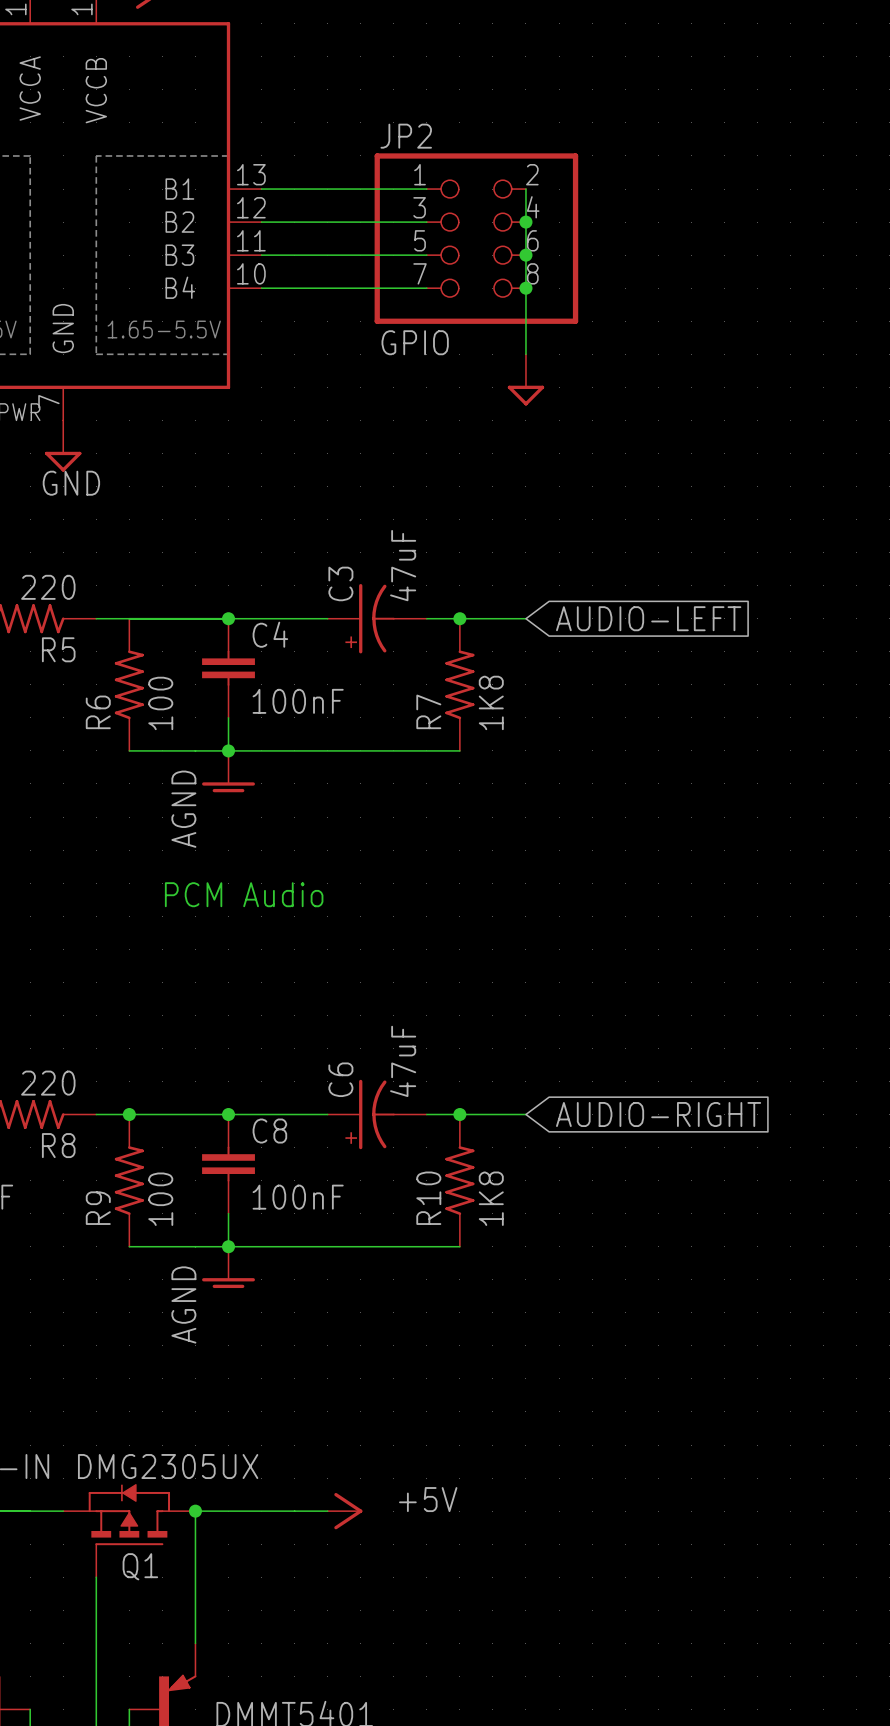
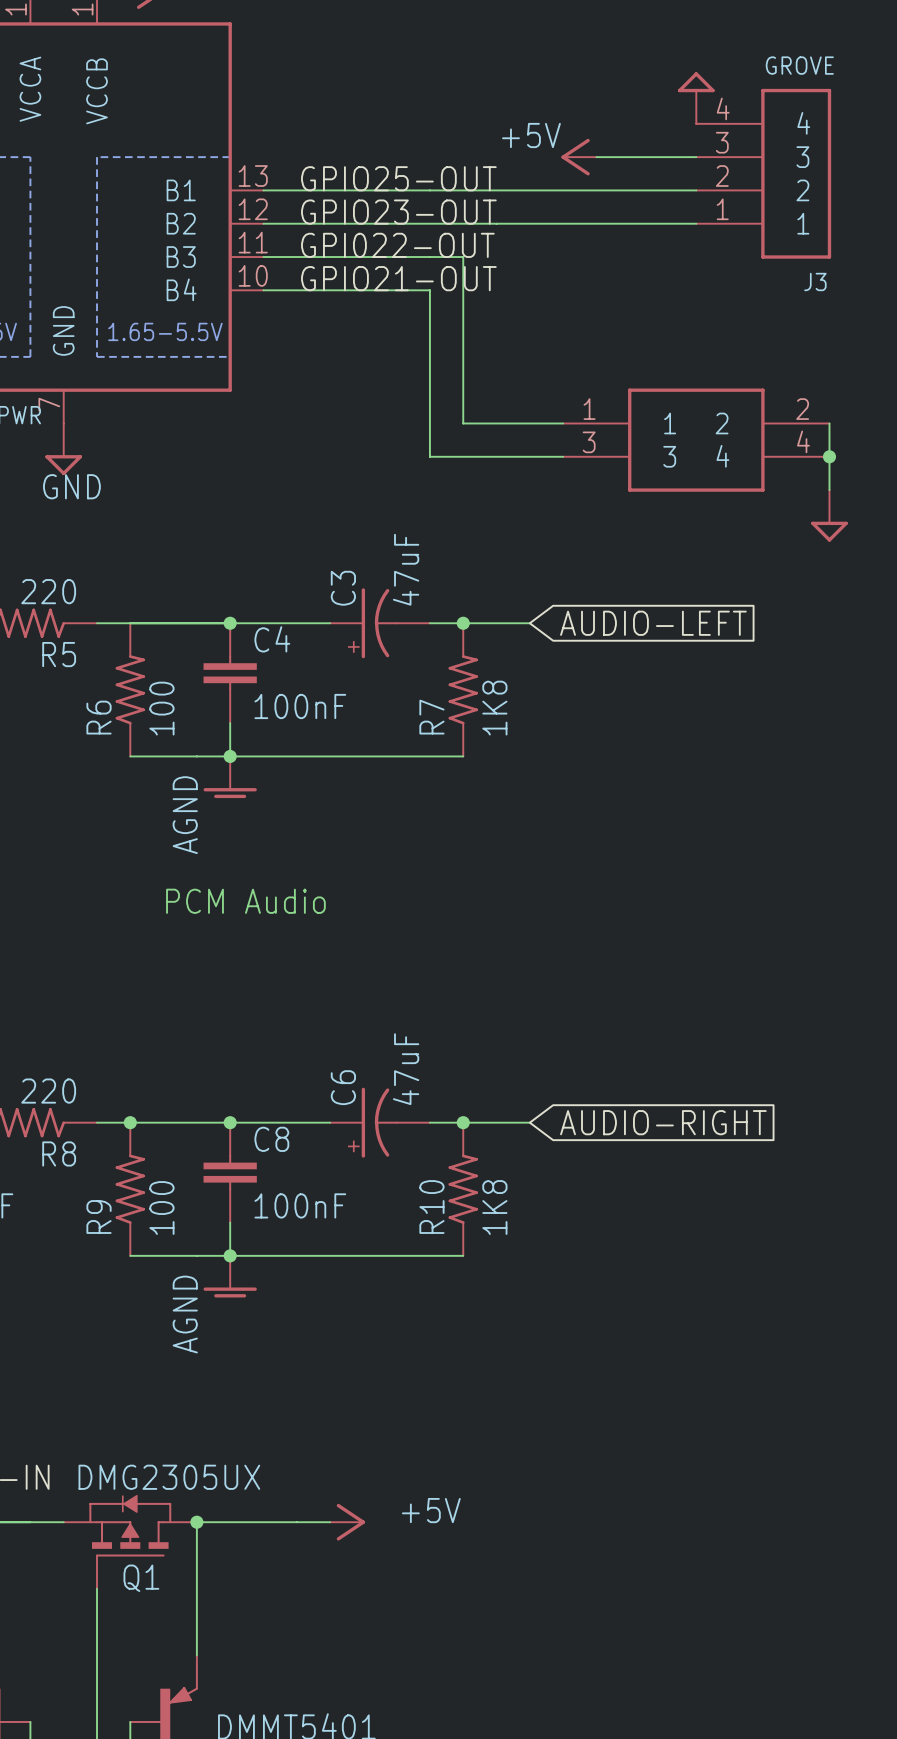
power symbol: none -> (696, 98)
power symbol: none -> +5V (578, 157)
wire: none -> (596, 157) (696, 157)
J3: none -> GROVE (763, 173)
label: none -> GPIO25-OUT (398, 178)
wire: none -> (429, 190) (696, 190)
wire: (525, 189) (525, 354) -> none
label: none -> GPIO23-OUT (398, 212)
wire: none -> (429, 223) (696, 223)
junction: (525, 222) -> none
JP2: GPIO (476, 238) -> none
label: none -> GPI022-OUT (397, 245)
wire: none -> (429, 257) (463, 257) (463, 423) (563, 423)
junction: (525, 255) -> none
label: none -> GPIO21-OUT (398, 278)
wire: none -> (429, 290) (429, 456) (563, 456)
junction: (525, 288) -> none
power symbol: (525, 379) -> none
wire: none -> (829, 423) (829, 490)
part: none -> (696, 440)
junction: none -> (829, 456)
power symbol: none -> (829, 515)

